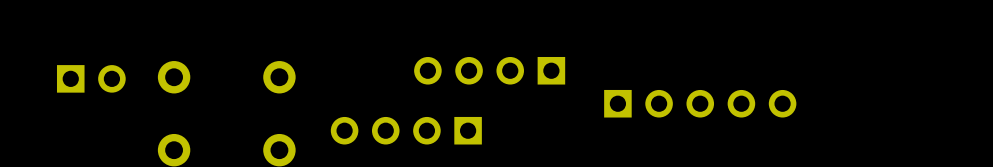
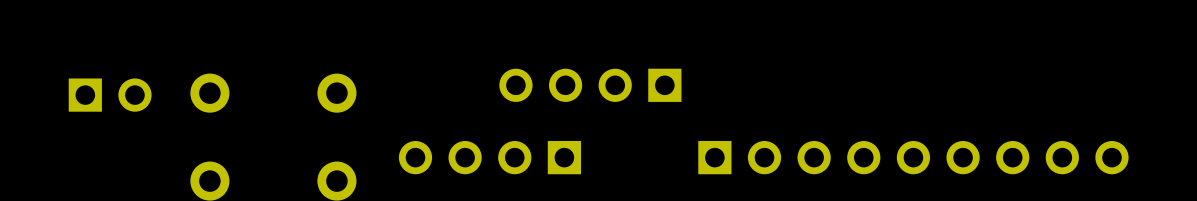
part: (700, 103) -> none
part: none -> (913, 157)

